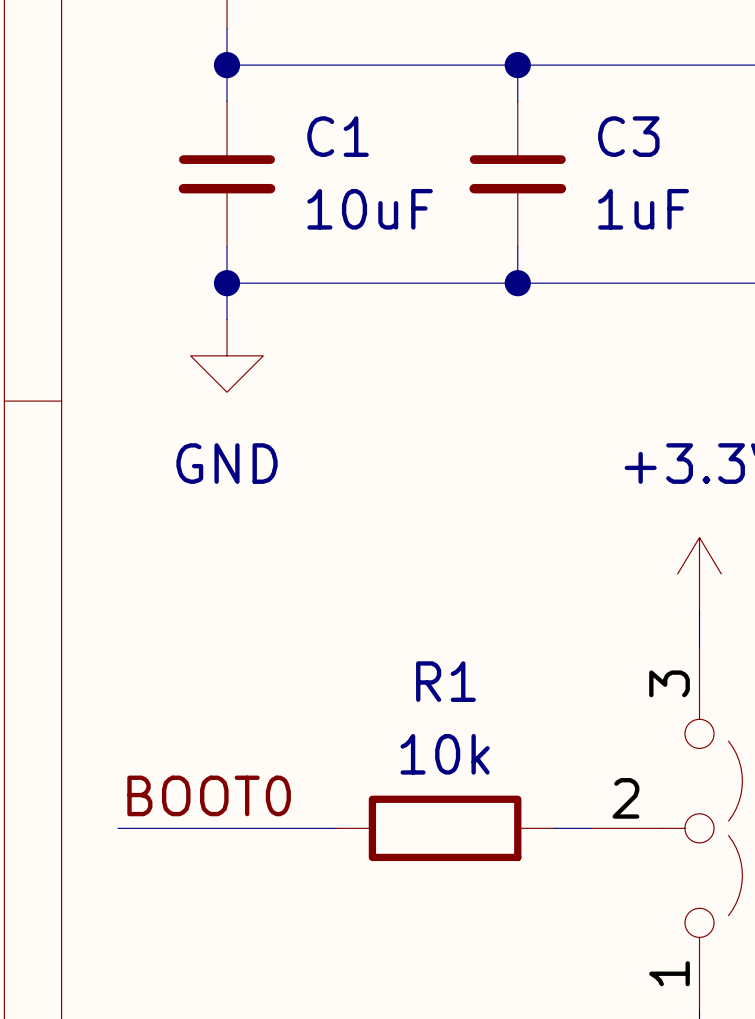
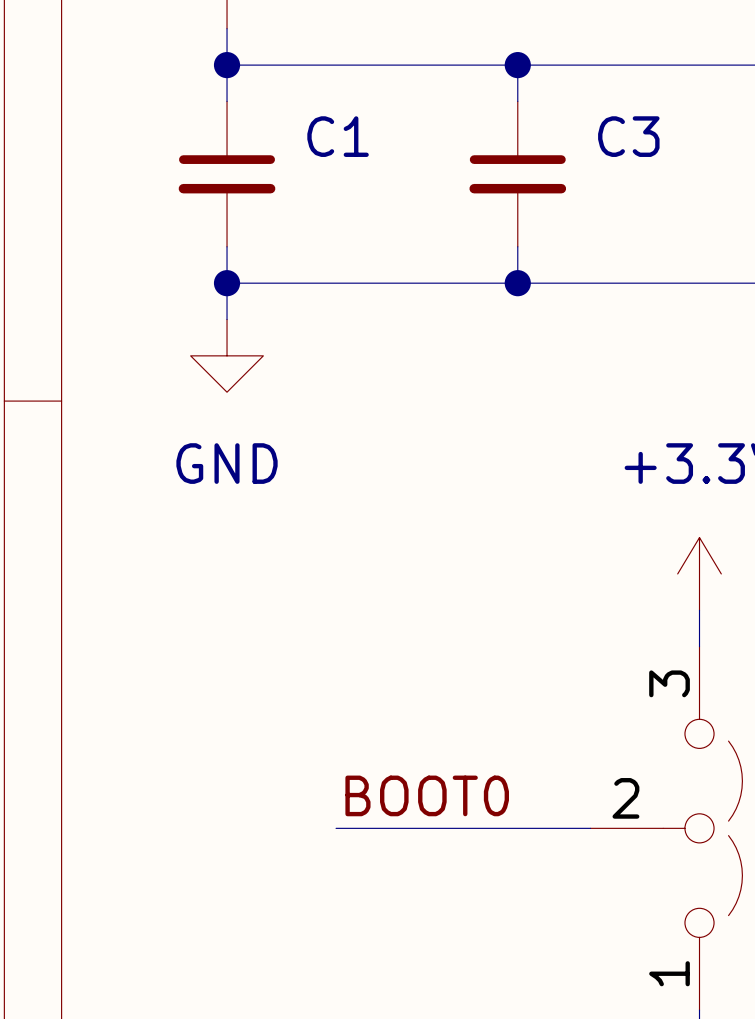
C1 value: 10uF (370, 209) -> none
C3 value: 1uF (643, 209) -> none
label position: BOOT0 (209, 795) -> BOOT0 (427, 795)
wire: (117, 828) (336, 828) -> (554, 828) (336, 828)
R1: 10k (445, 828) -> none

